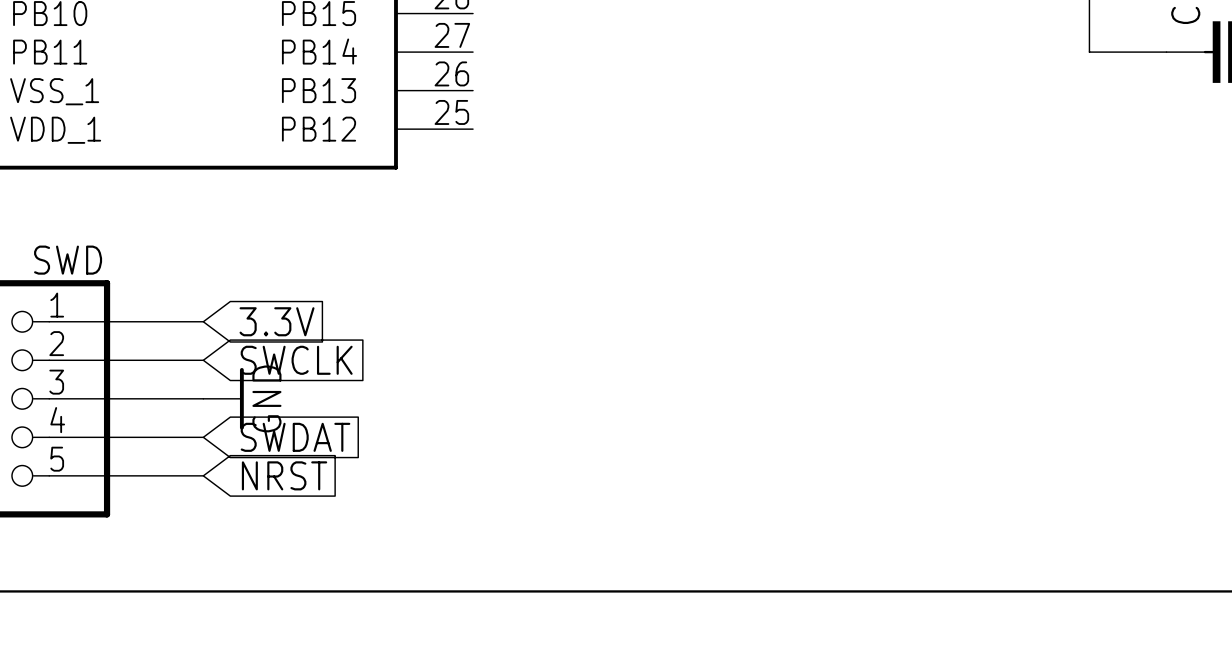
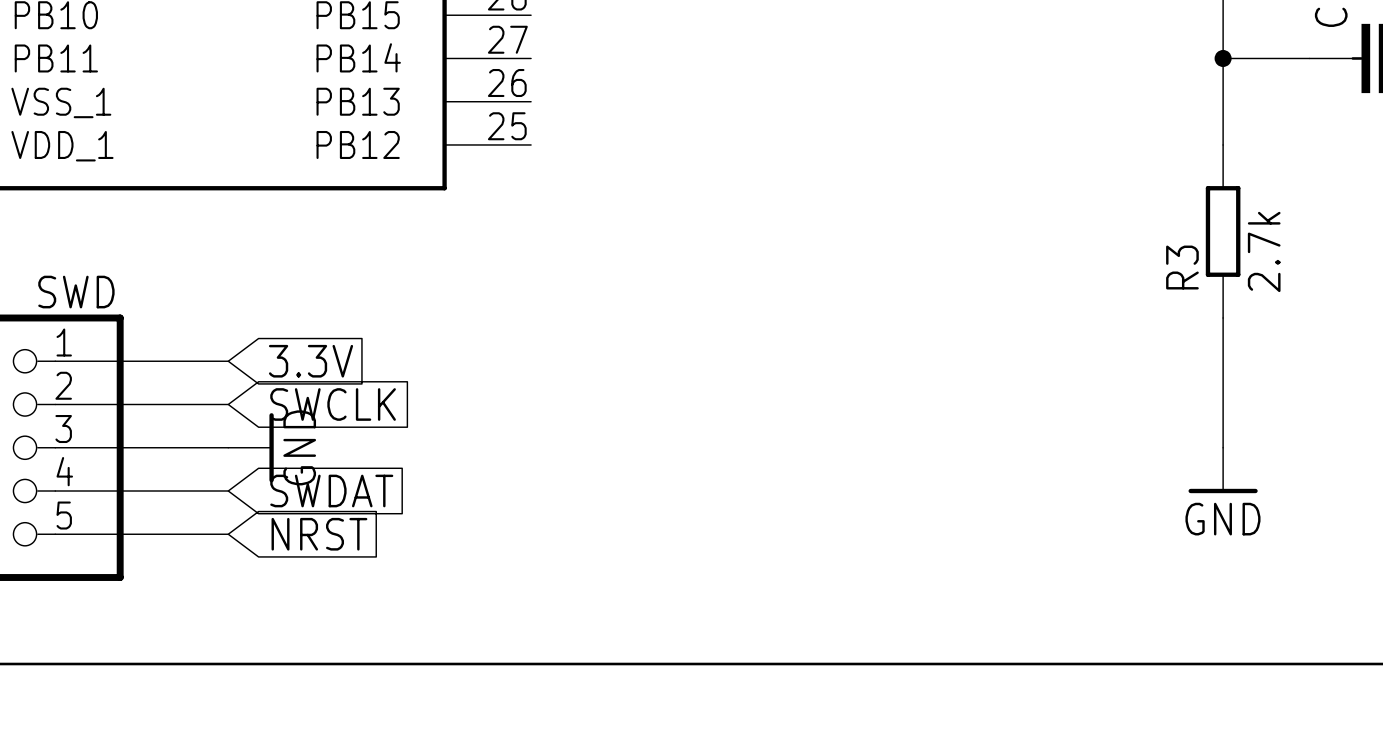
wire: none -> (1223, 58) (1223, 144)
junction: none -> (1223, 58)
R3: none -> 2.7k (1223, 231)
wire: none -> (1223, 317) (1223, 447)
power symbol: none -> GND (1223, 470)

